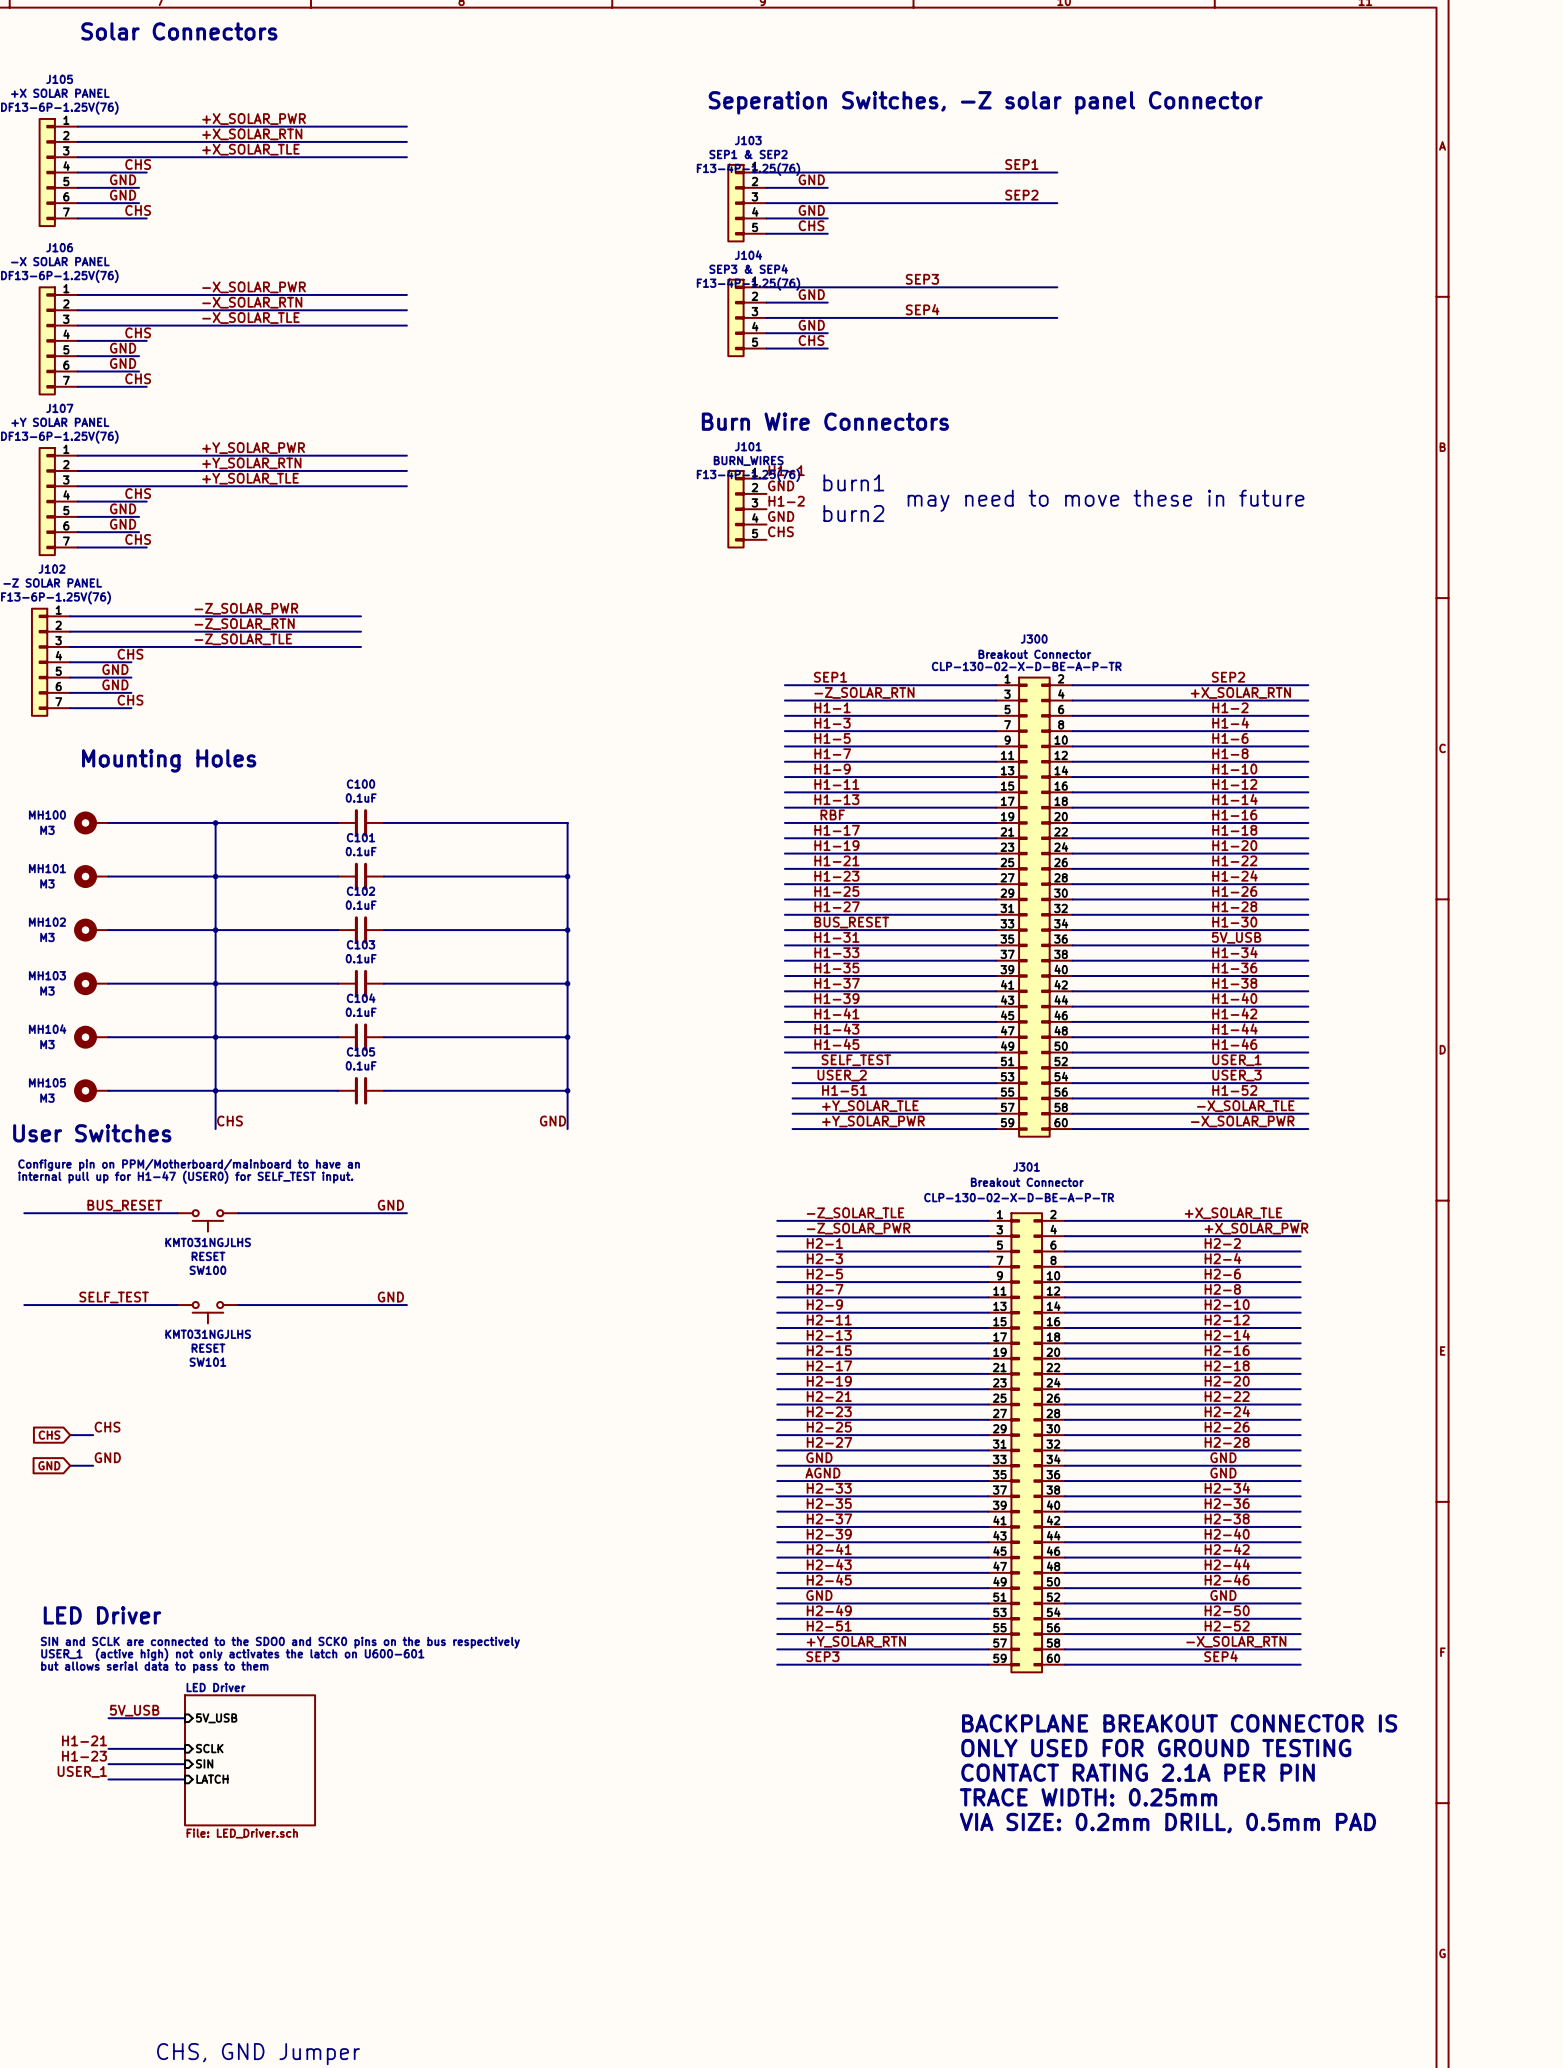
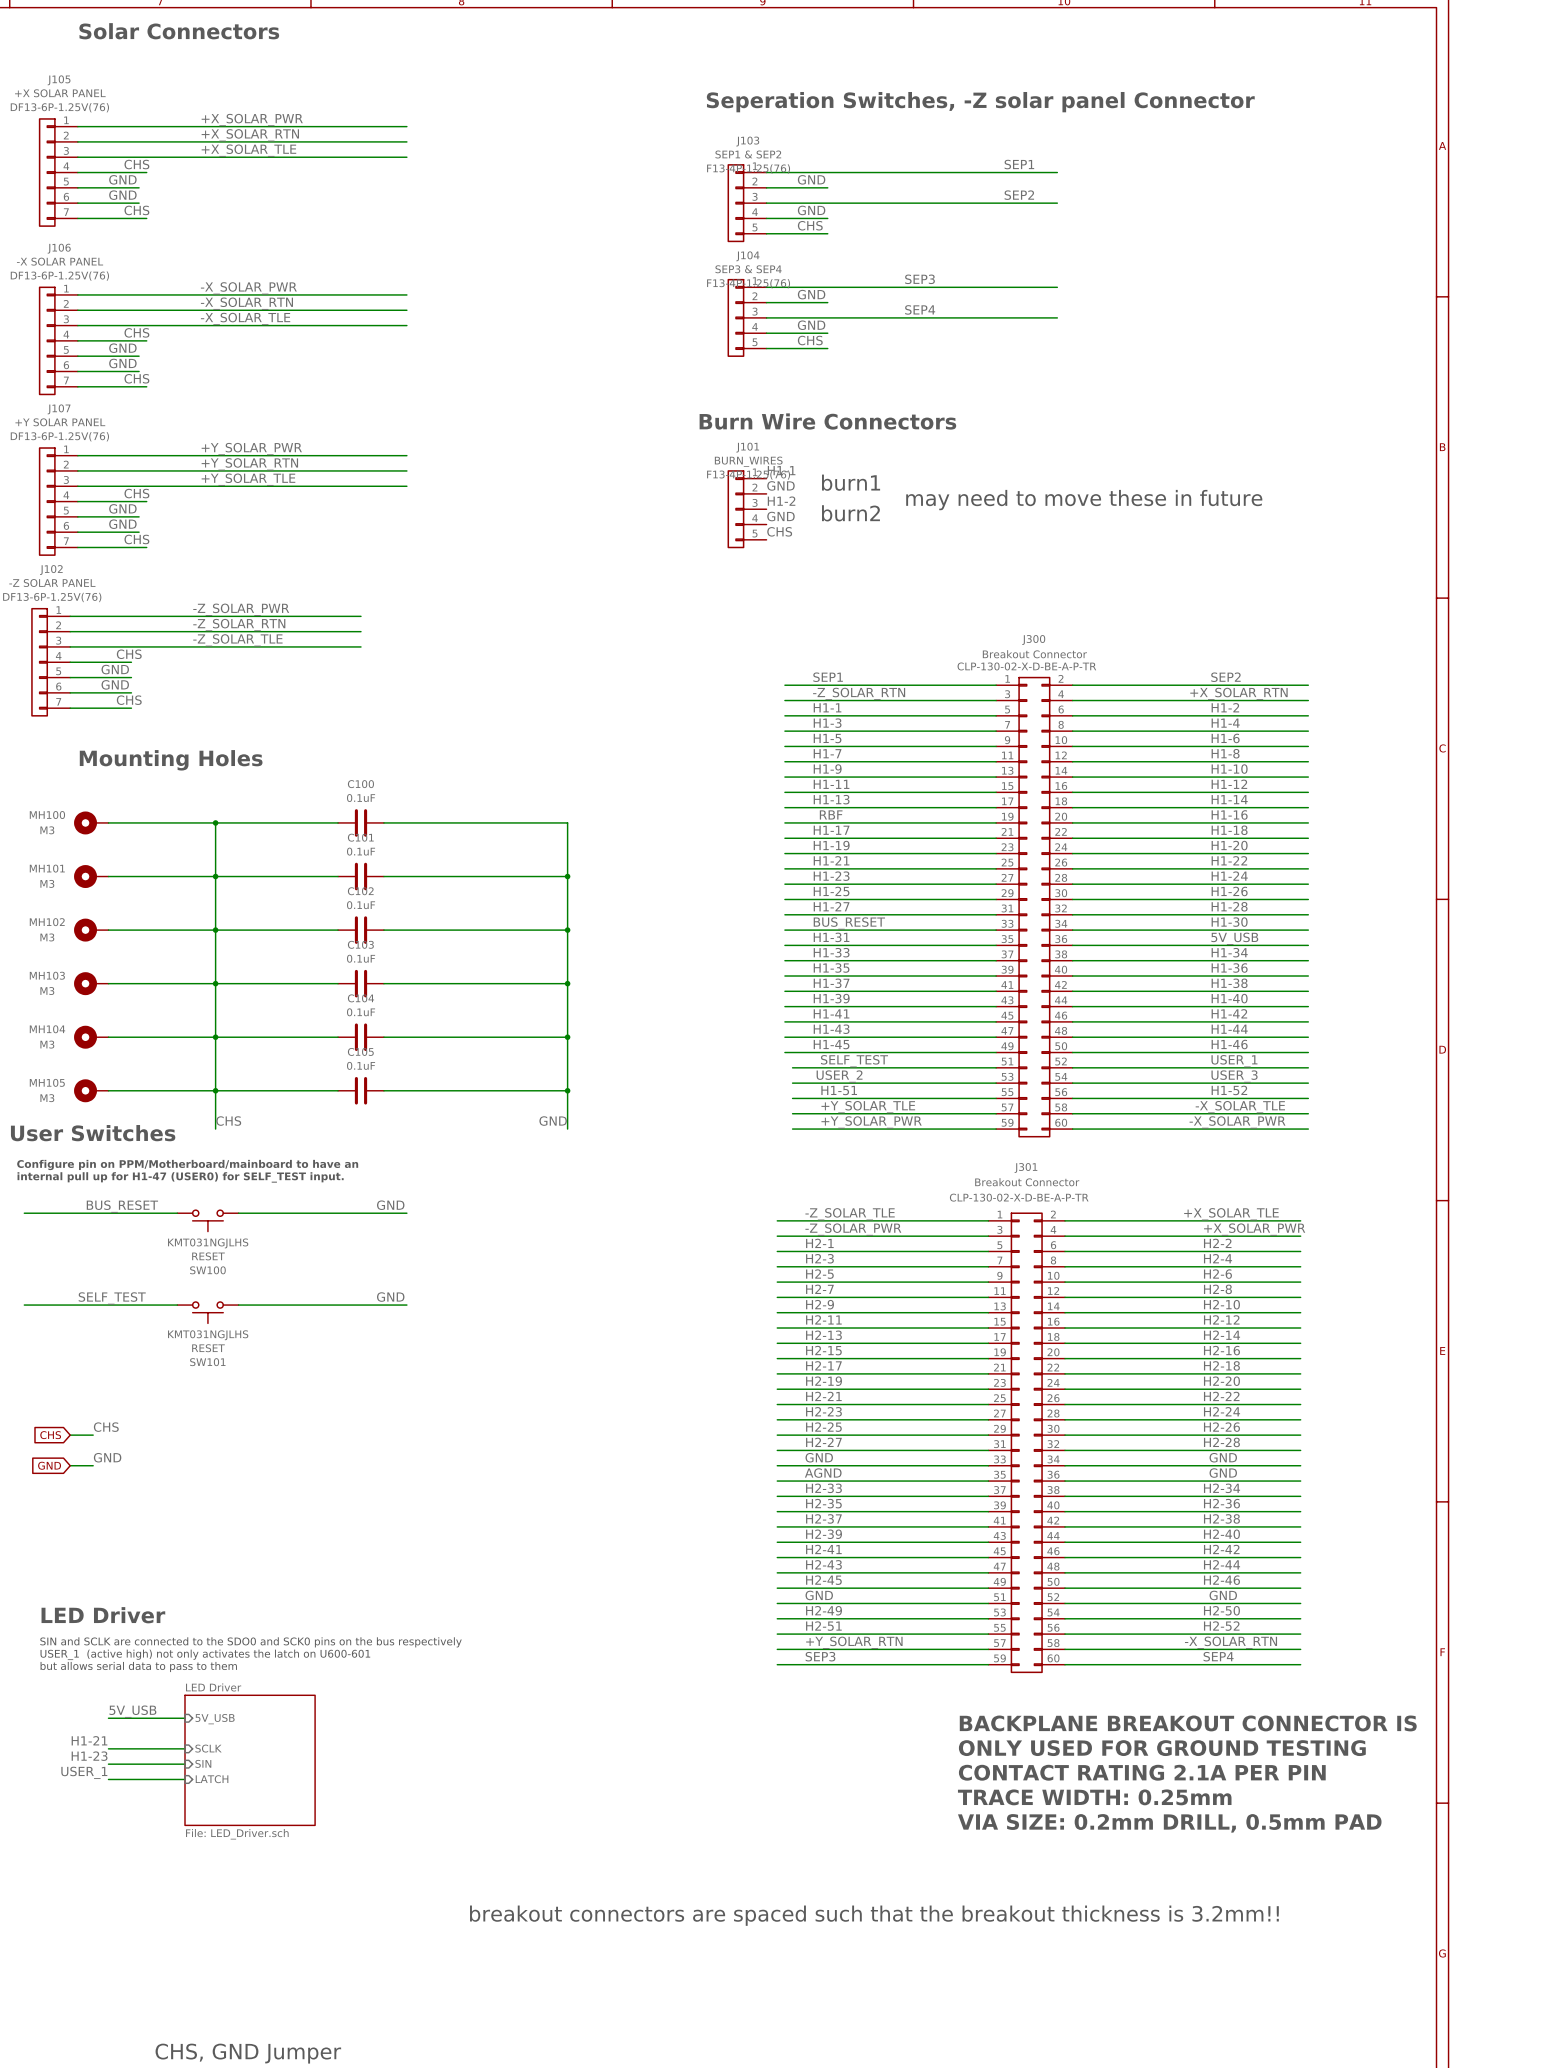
text: none -> breakout connectors are spaced such that the breakout thickness is 3.2mm!! (874, 1915)

